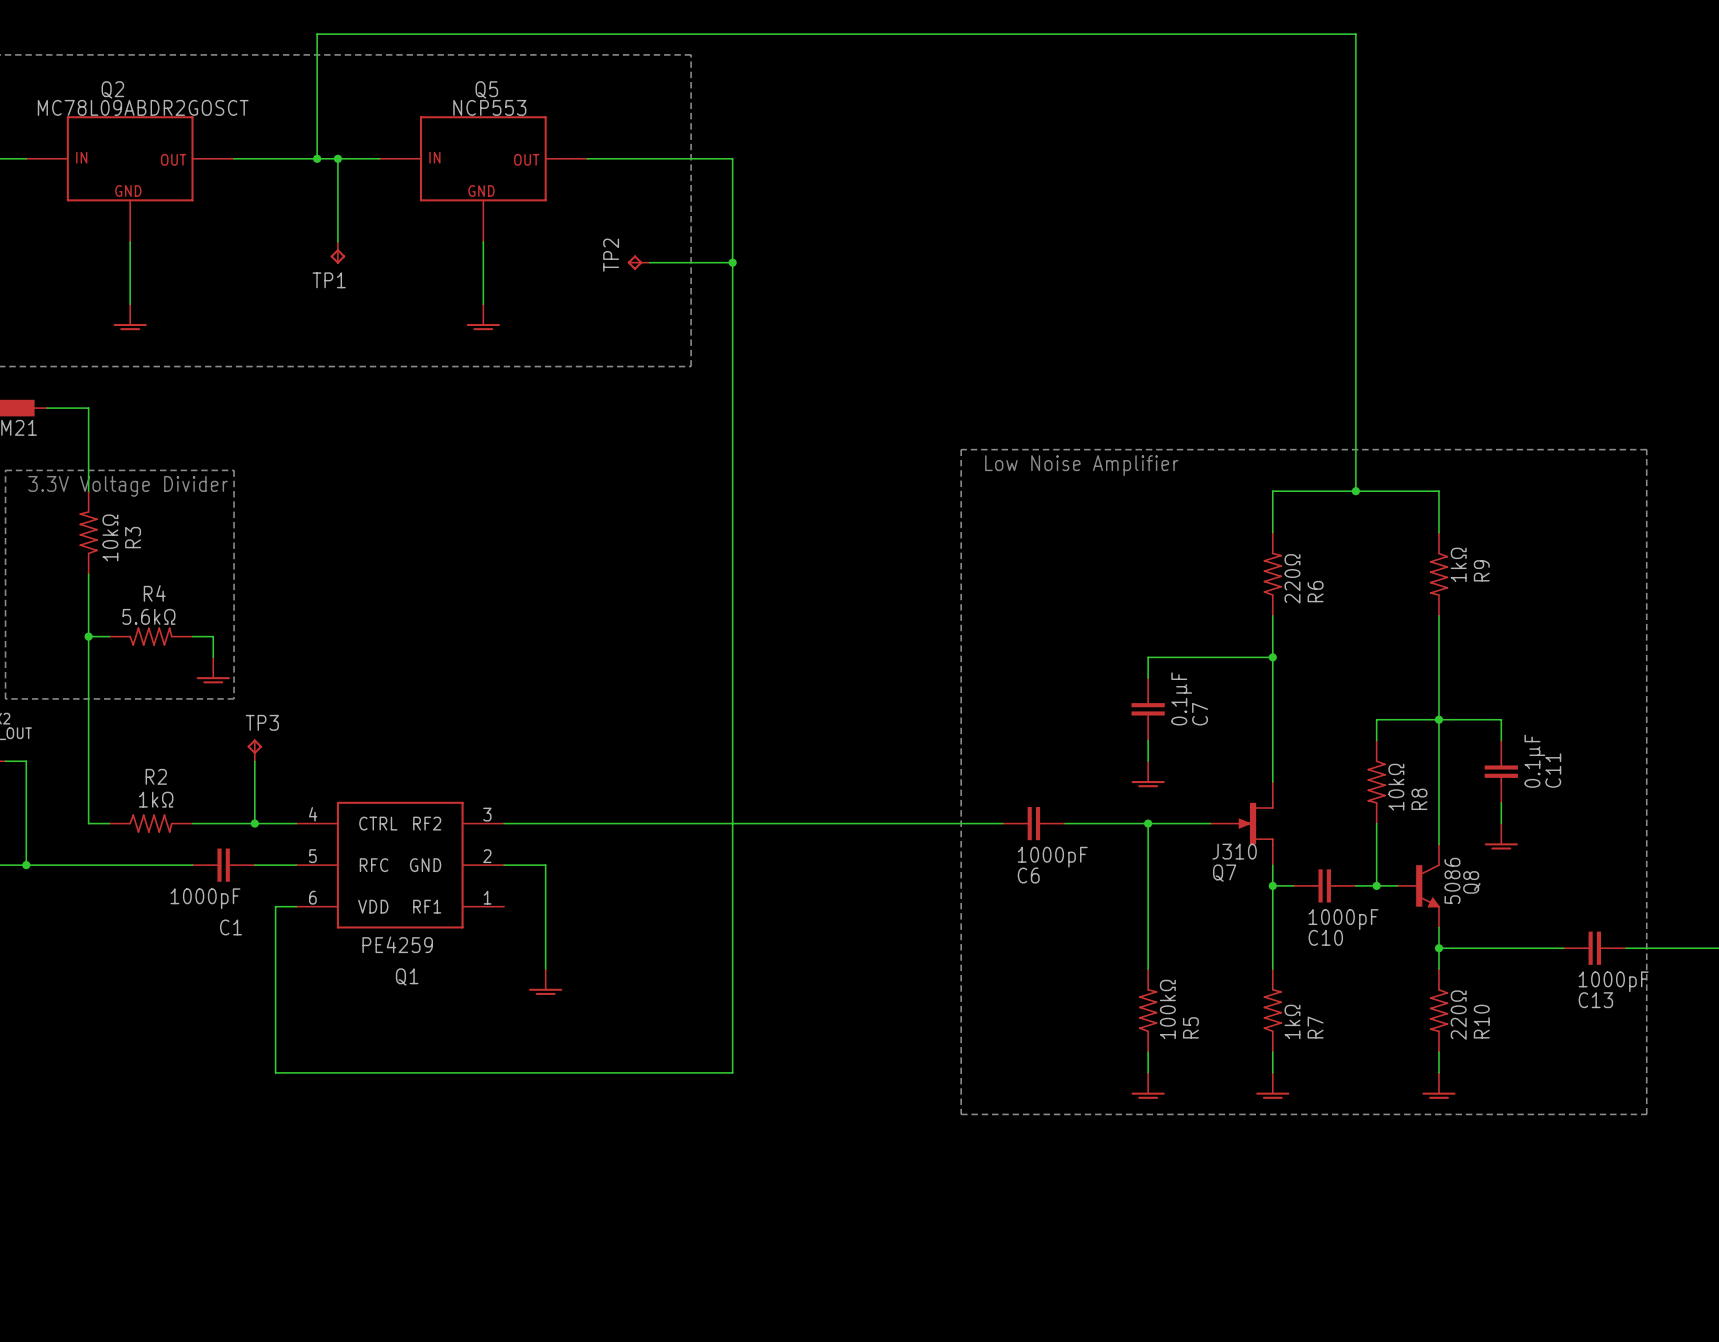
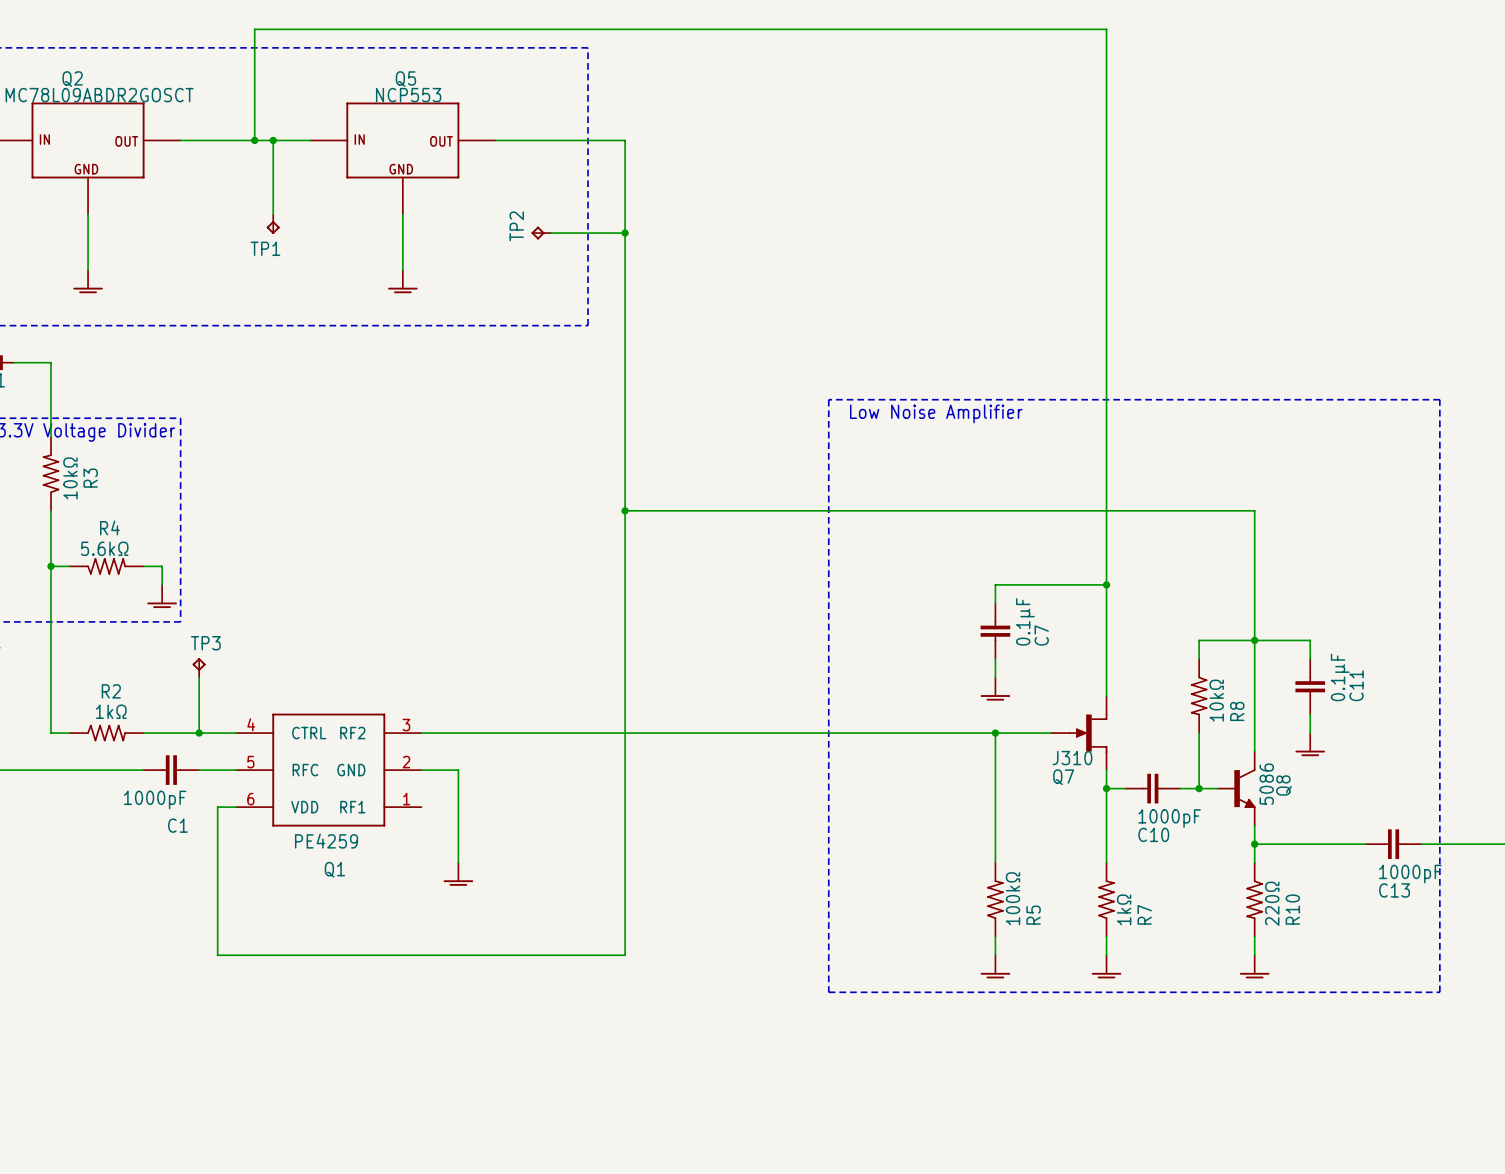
wire: (1272, 34) (1355, 34) (1355, 491) -> (1106, 29) (1106, 436)
wire: (1272, 491) (1438, 491) (1438, 532) -> none
junction: (1355, 491) -> none
wire: none -> (625, 510) (1254, 510) (1254, 547)
junction: none -> (625, 510)
R6: 220Ω (1272, 574) -> none
R9: 1kΩ (1438, 574) -> none
C6: 1000pF (1033, 823) -> none

